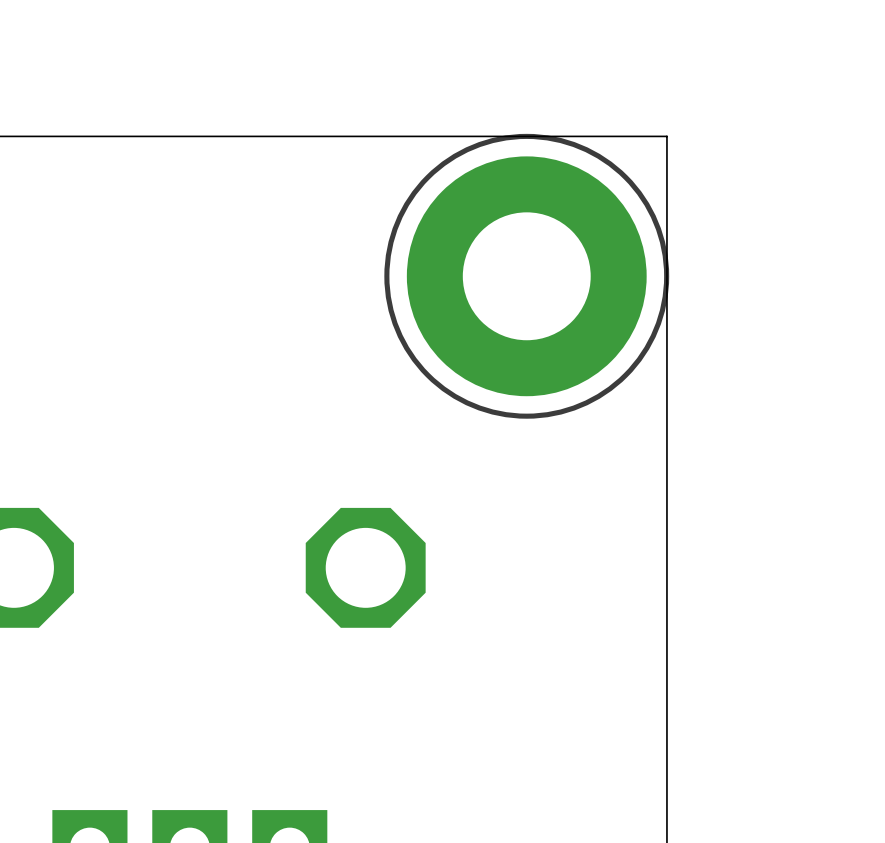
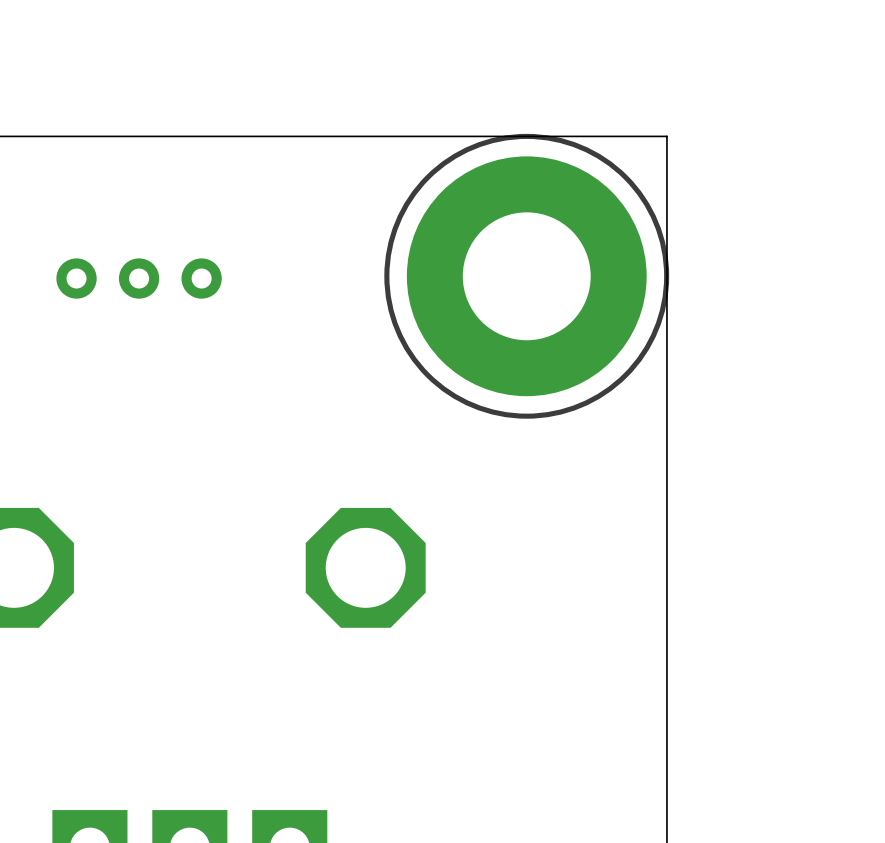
part: none -> (139, 278)

